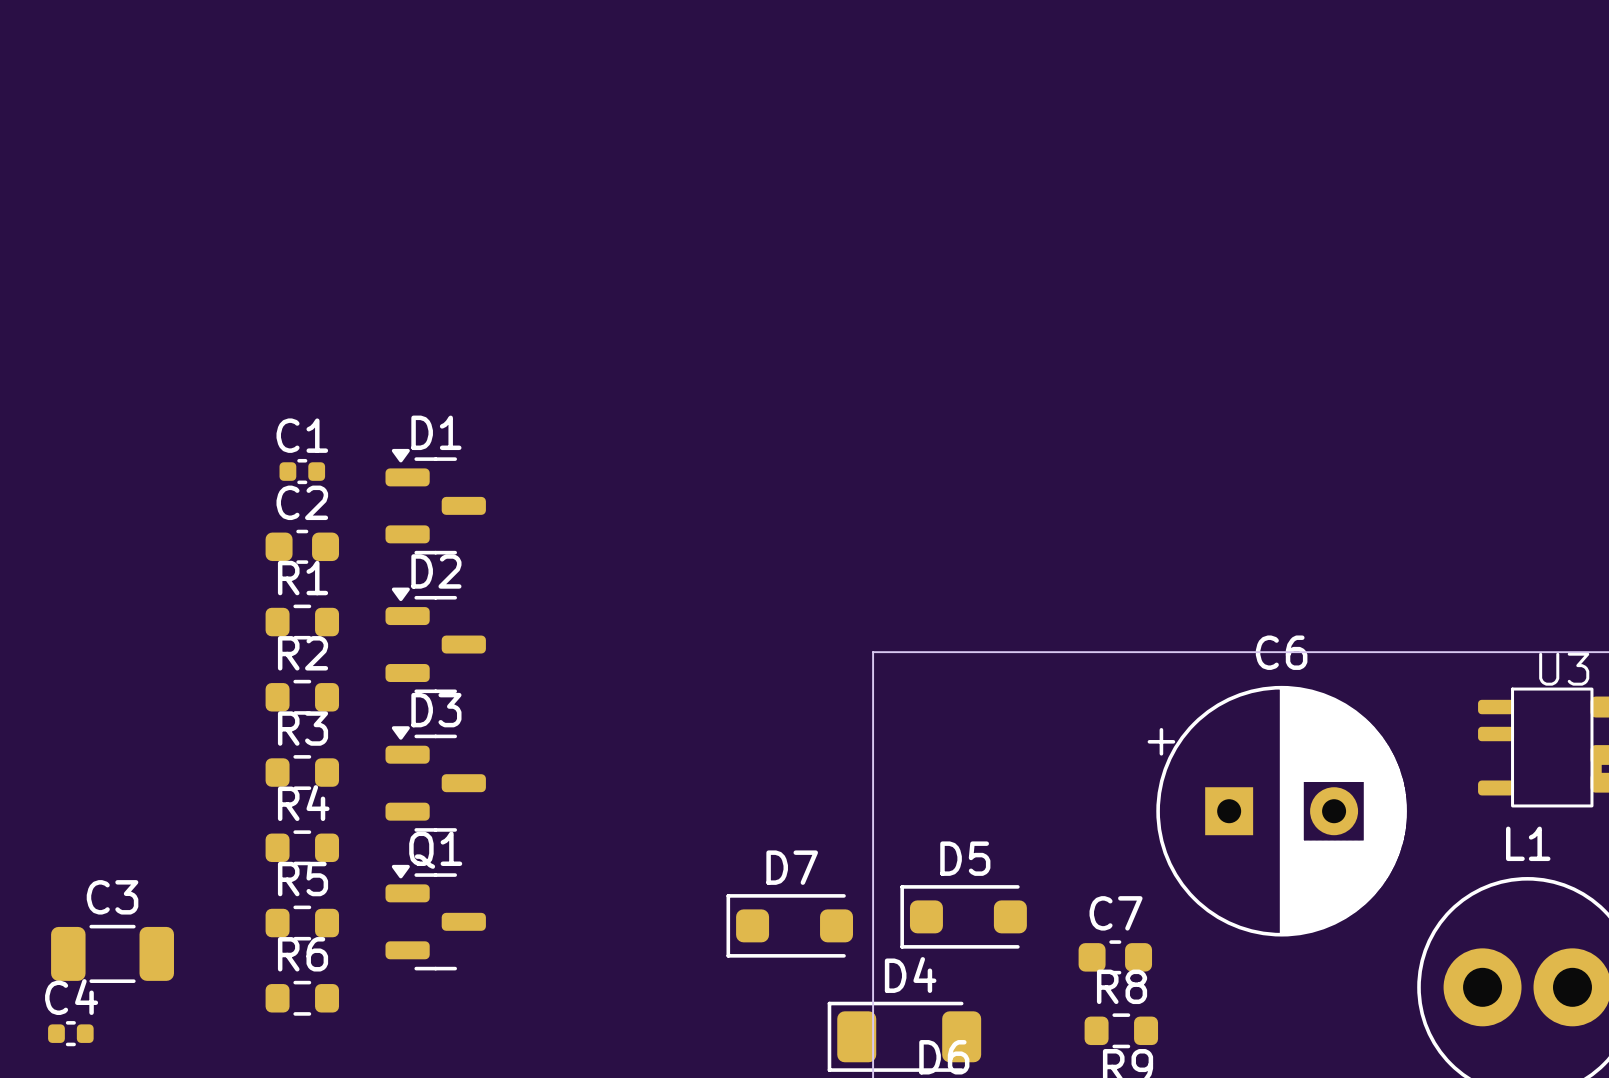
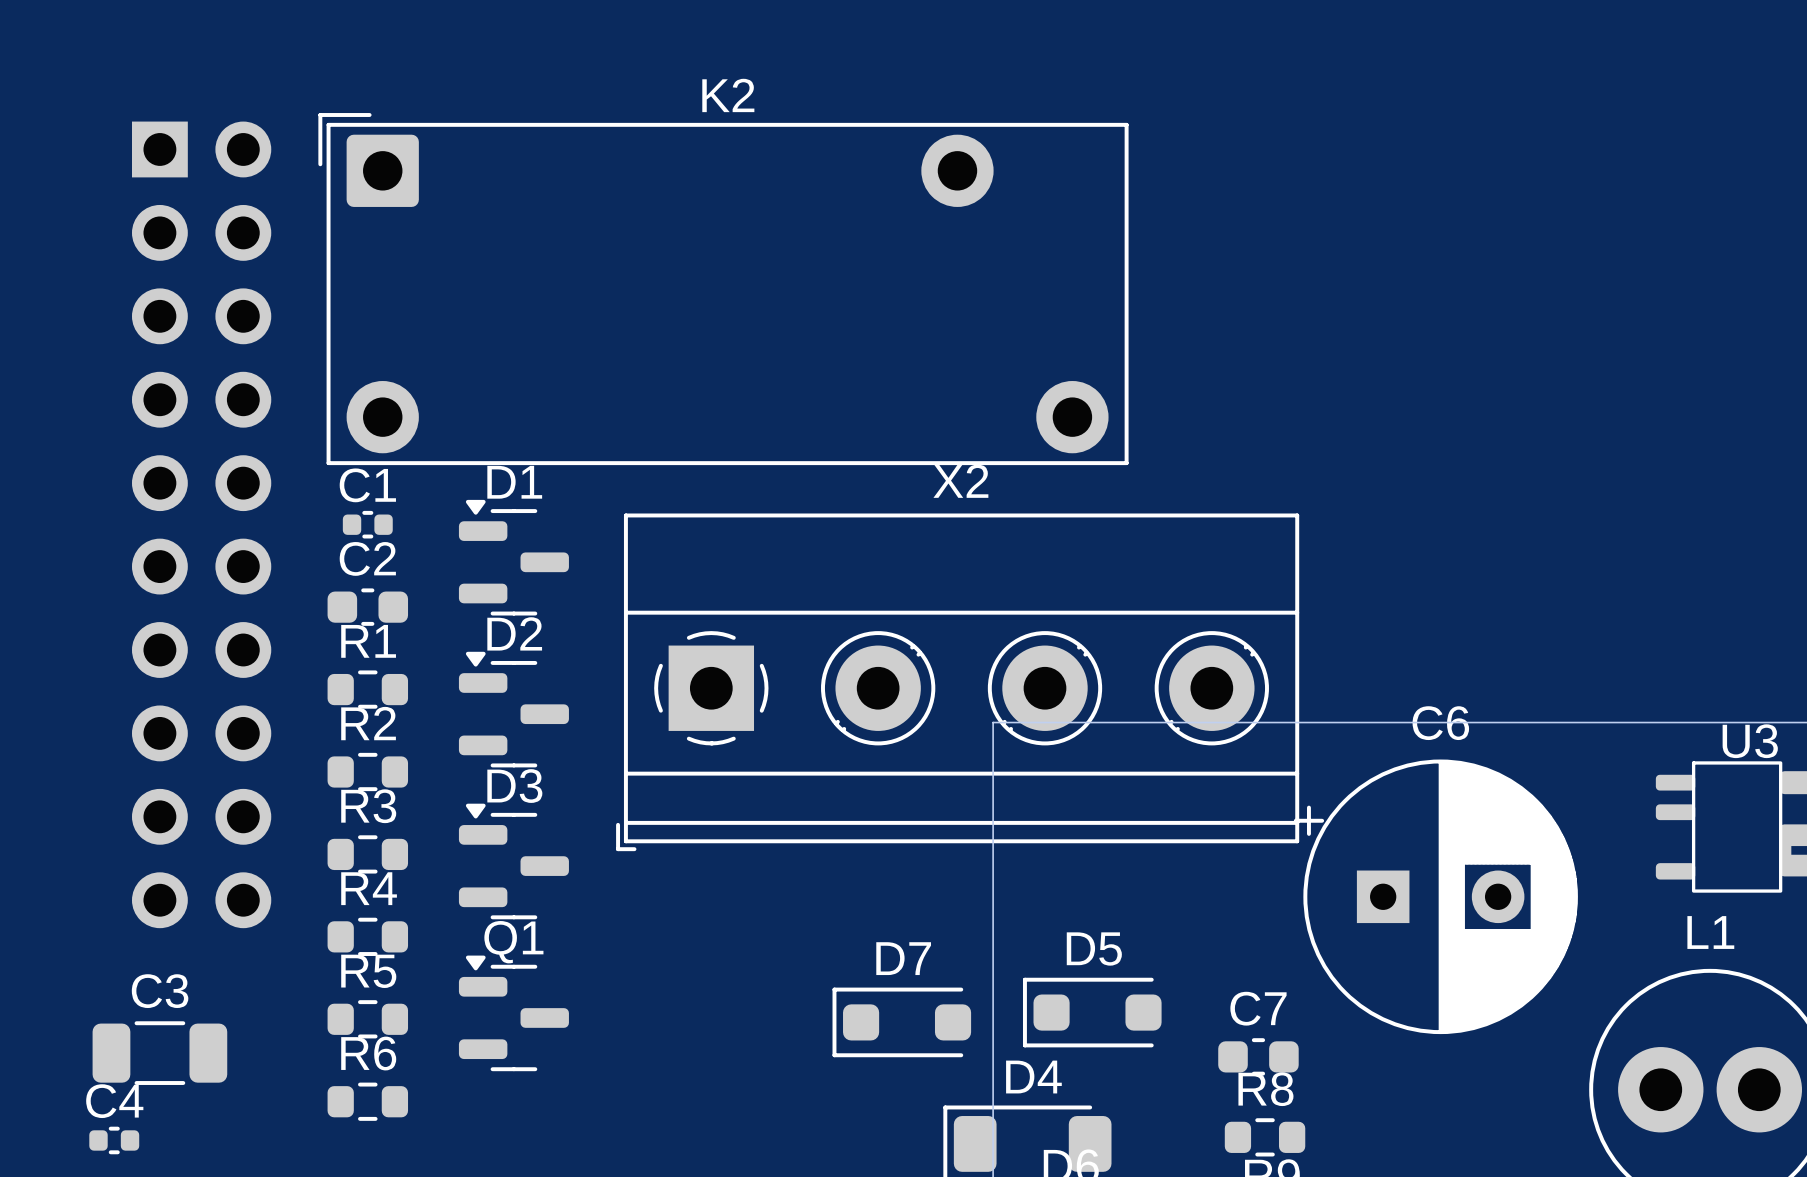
K2: none -> (723, 289)
part: none -> (201, 524)
X2: none -> (957, 682)

